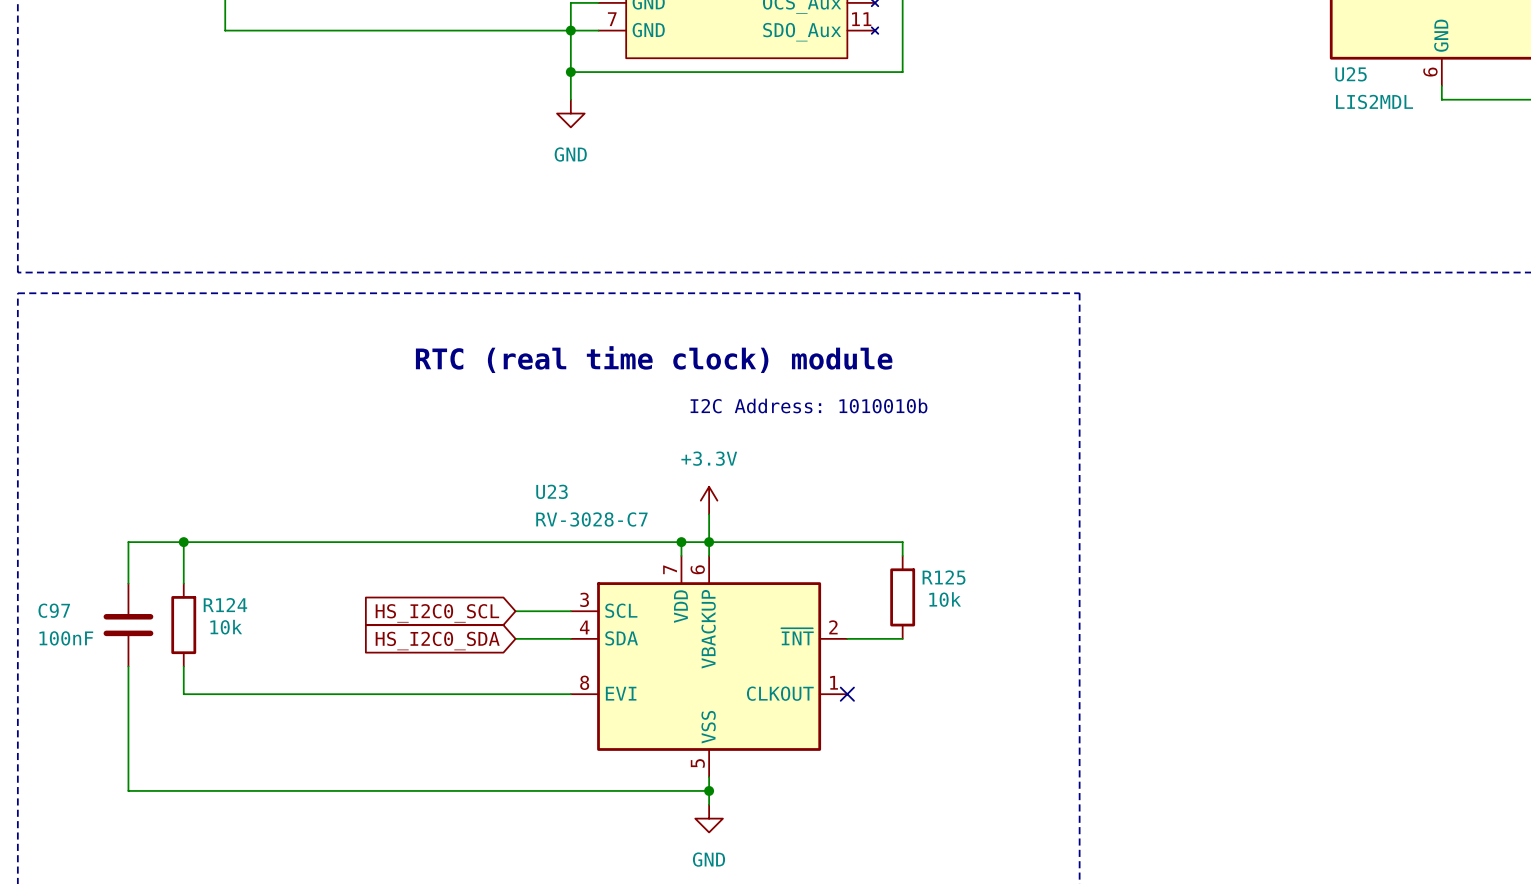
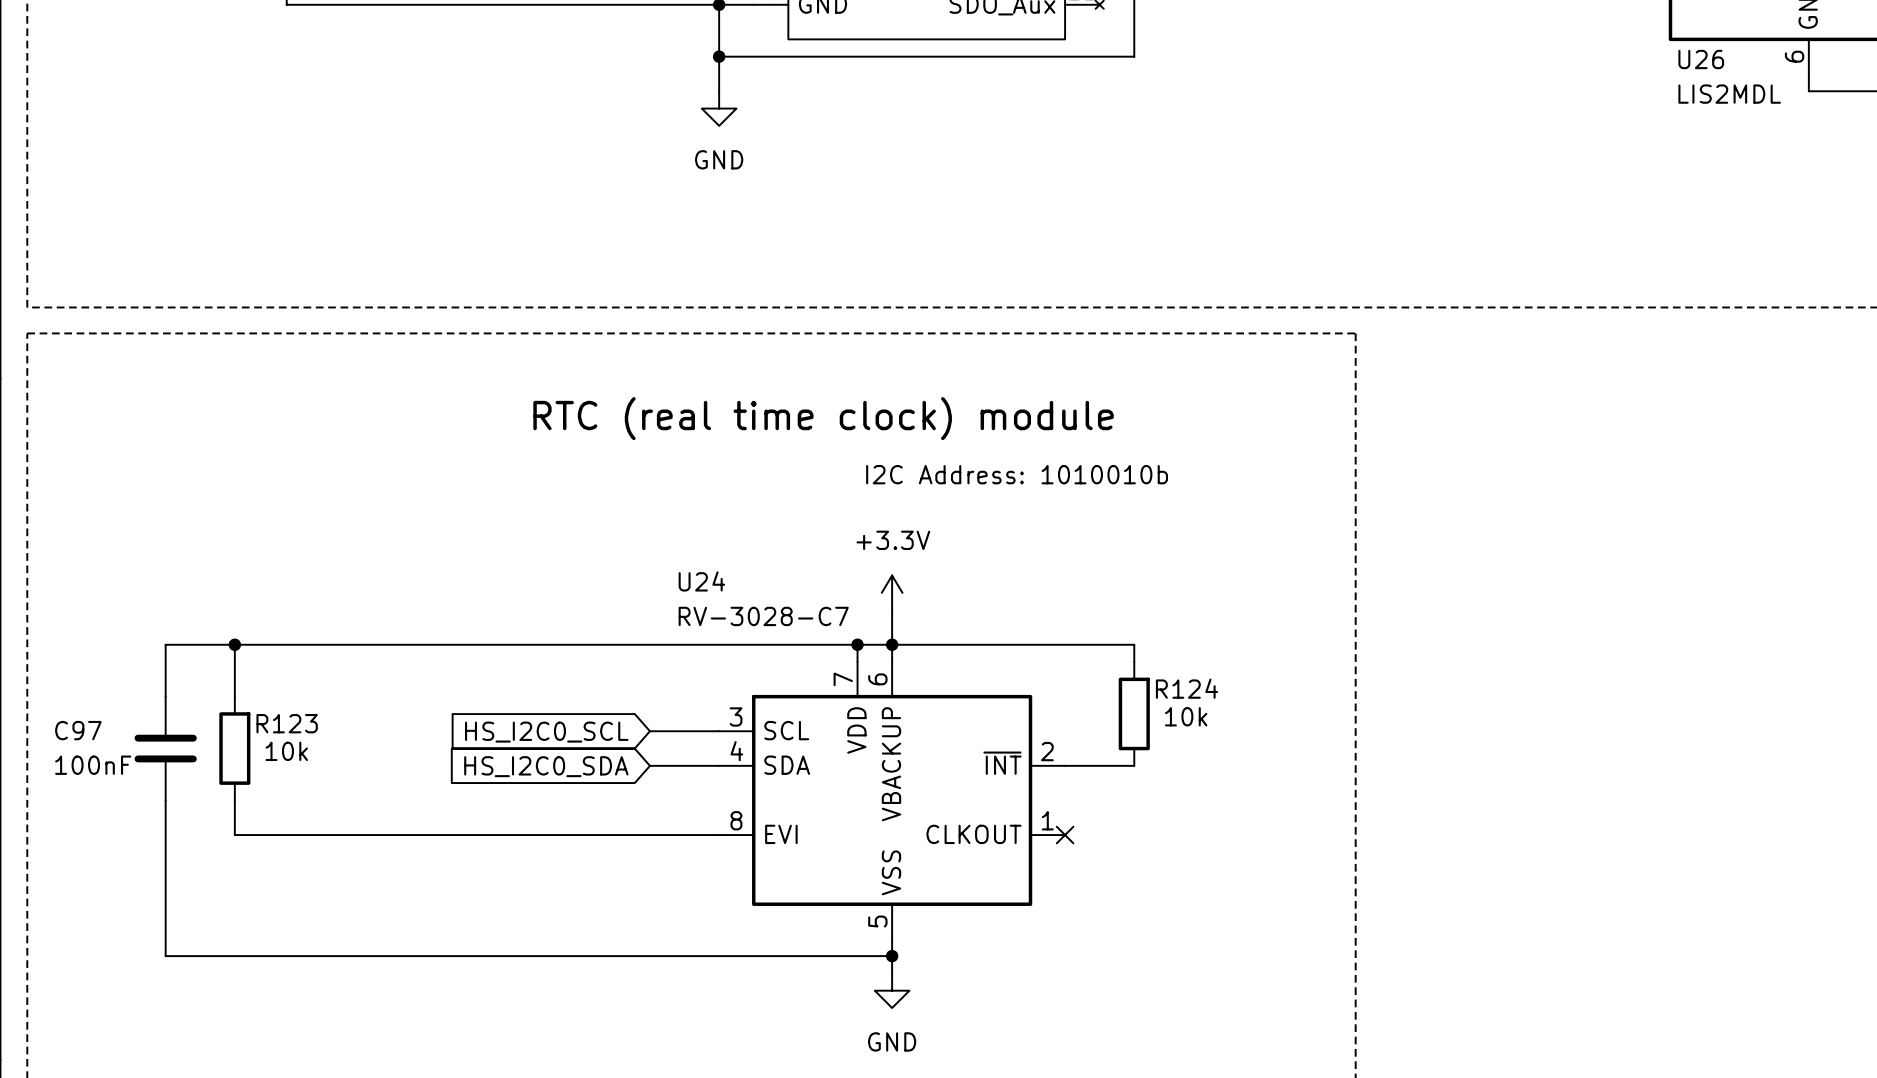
U25 name: U25 (1351, 74) -> U26 (1701, 59)
U23 name: U23 (552, 491) -> U24 (701, 581)
R125 name: R125 (944, 577) -> R124 (1186, 688)
R124 name: R124 (225, 605) -> R123 (287, 723)

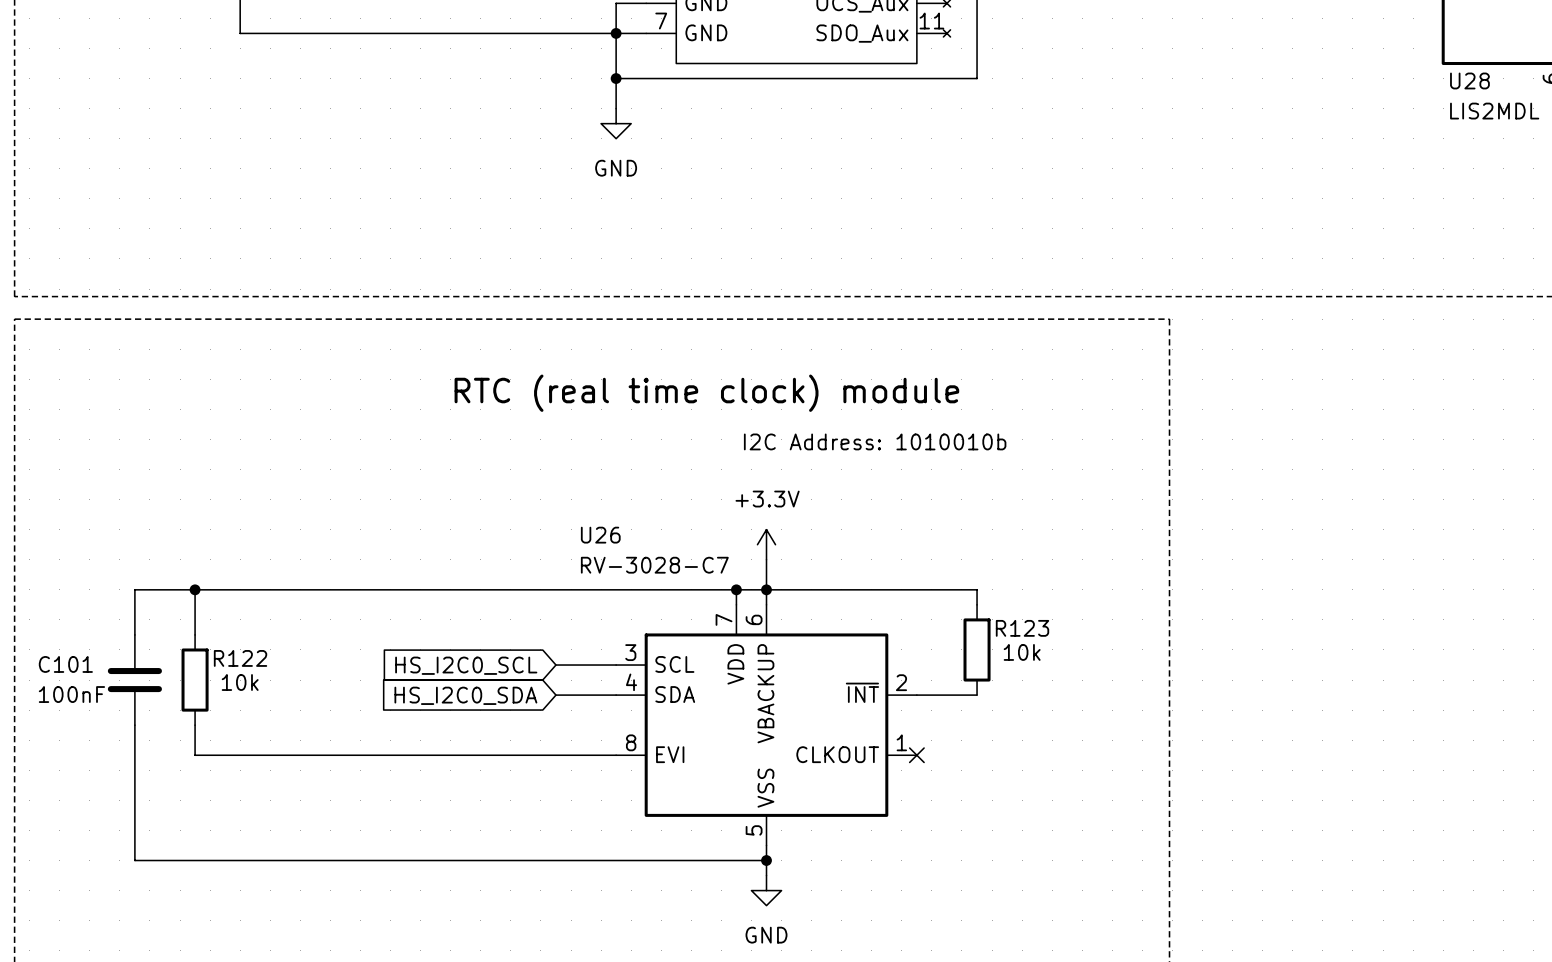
U26 name: U26 (1701, 59) -> U28 (1469, 80)
U24 name: U24 (701, 581) -> U26 (600, 535)
R124 name: R124 (1186, 688) -> R123 (1022, 628)
R123 name: R123 (287, 723) -> R122 (240, 658)
C97 name: C97 (78, 730) -> C101 (65, 664)

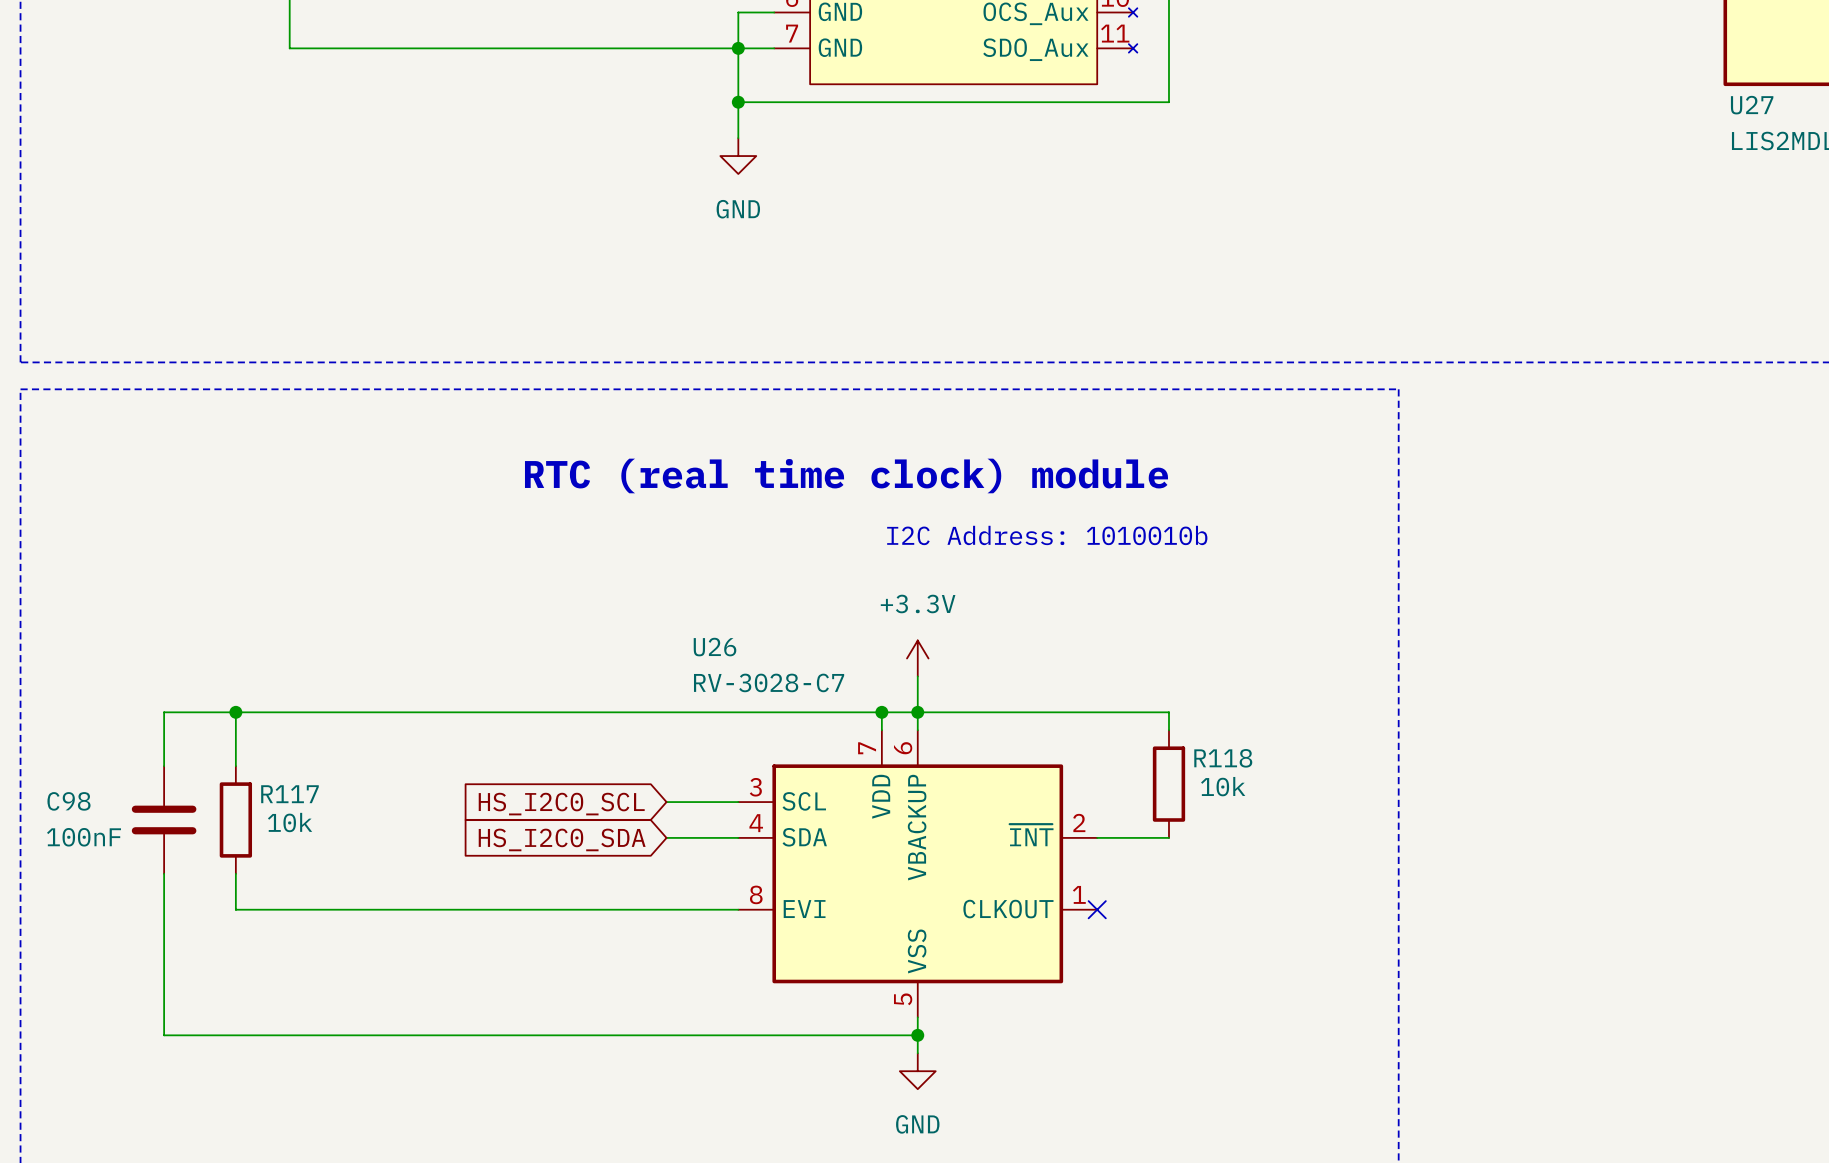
U28 name: U28 (1469, 80) -> U27 (1752, 105)
R123 name: R123 (1022, 628) -> R118 (1223, 758)
R122 name: R122 (240, 658) -> R117 (289, 794)
C101 name: C101 (65, 664) -> C98 (68, 801)

